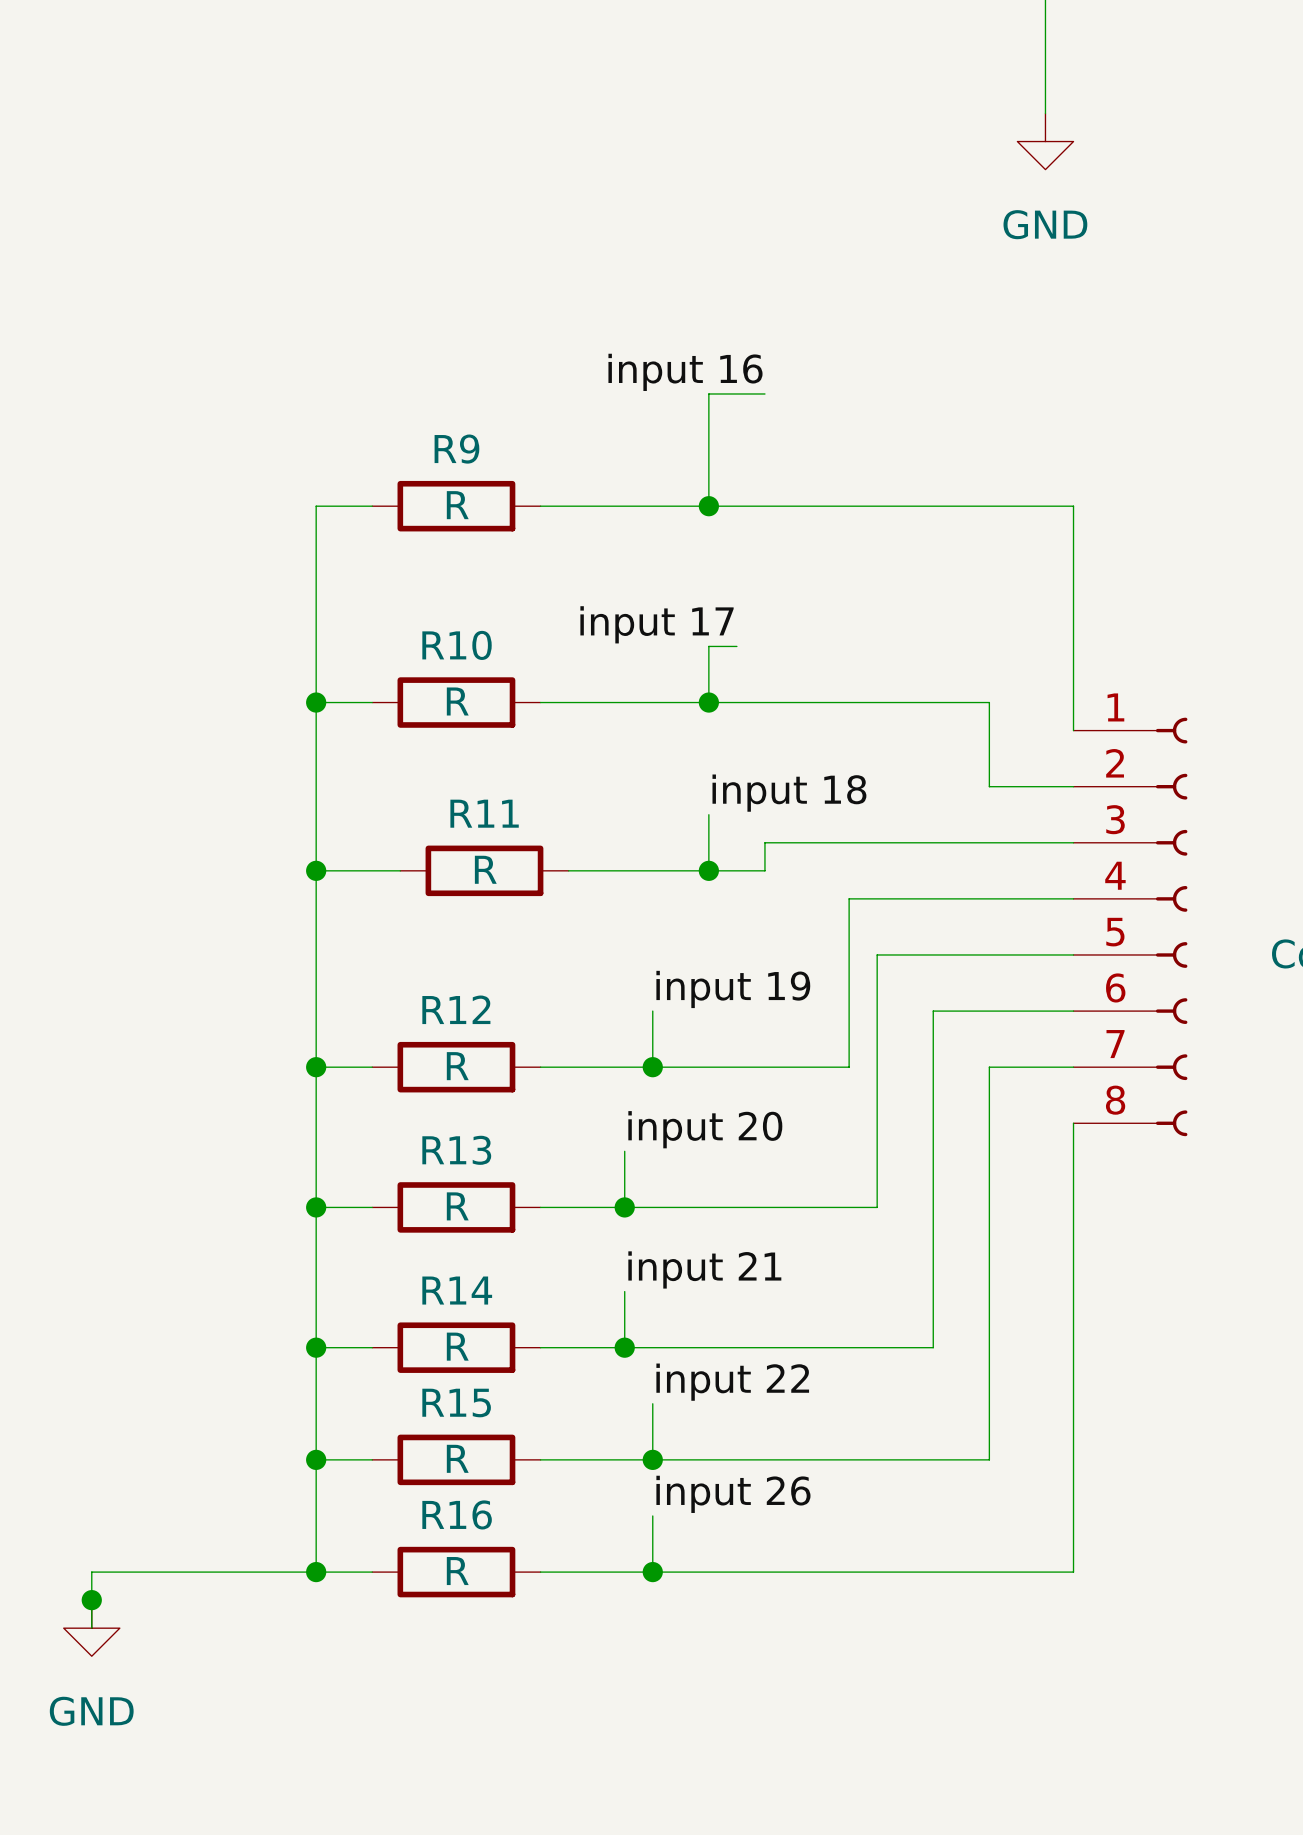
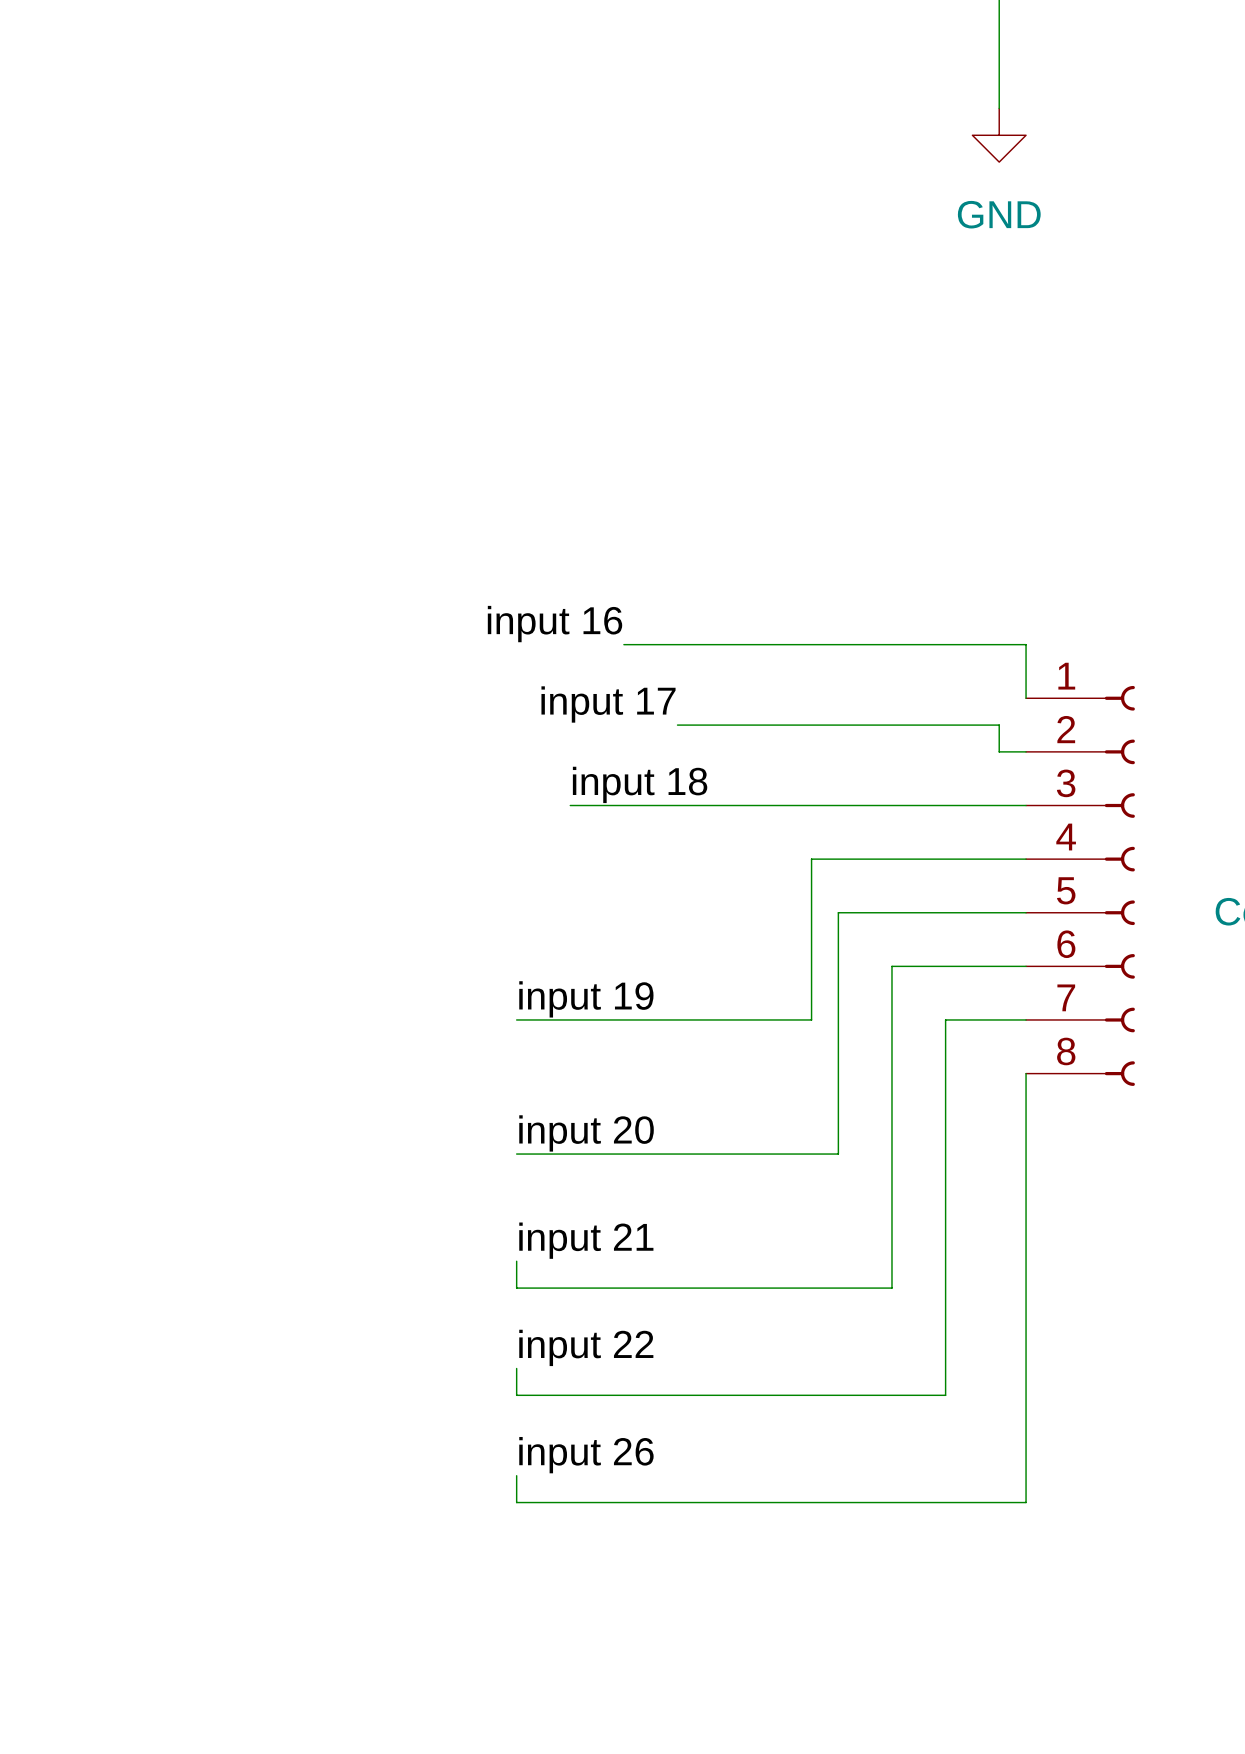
label position: input 16 (685, 372) -> input 16 (555, 624)
wire: (764, 393) (708, 393) (708, 506) -> none
wire: (372, 506) (316, 506) (316, 1572) -> none
R9: R (456, 506) -> none
wire: (540, 506) (1073, 506) (1073, 674) -> (623, 644) (1026, 644)
junction: (708, 506) -> none
label position: input 17 (657, 624) -> input 17 (608, 704)
wire: (736, 646) (708, 646) (708, 702) -> none
wire: (316, 702) (372, 702) -> none
junction: (316, 702) -> none
R10: R (456, 702) -> none
wire: (540, 702) (989, 702) (989, 786) (1045, 786) -> (677, 725) (999, 725) (999, 751)
junction: (708, 702) -> none
label position: input 18 (789, 793) -> input 18 (640, 784)
wire: (708, 814) (708, 870) -> none
wire: (764, 842) (764, 870) (568, 870) -> (731, 805) (570, 805)
wire: (316, 870) (400, 870) -> none
junction: (316, 870) -> none
R11: R (484, 870) -> none
junction: (708, 870) -> none
label position: input 19 (733, 989) -> input 19 (586, 999)
wire: (652, 1011) (652, 1067) -> none
wire: (316, 1067) (372, 1067) -> none
junction: (316, 1067) -> none
R12: R (456, 1067) -> none
junction: (652, 1067) -> none
label position: input 20 (705, 1129) -> input 20 (586, 1133)
wire: (624, 1151) (624, 1207) -> none
wire: (316, 1207) (372, 1207) -> none
junction: (316, 1207) -> none
R13: R (456, 1207) -> none
junction: (624, 1207) -> none
label position: input 21 (704, 1269) -> input 21 (586, 1240)
wire: (624, 1291) (624, 1347) -> none
wire: none -> (516, 1261) (516, 1288)
wire: (316, 1347) (372, 1347) -> none
junction: (316, 1347) -> none
R14: R (456, 1347) -> none
junction: (624, 1347) -> none
label position: input 22 (732, 1382) -> input 22 (586, 1347)
wire: (652, 1403) (652, 1459) -> none
wire: none -> (516, 1368) (516, 1395)
wire: (316, 1459) (372, 1459) -> none
junction: (316, 1459) -> none
R15: R (456, 1459) -> none
junction: (652, 1459) -> none
label position: input 26 (733, 1494) -> input 26 (586, 1455)
wire: (652, 1515) (652, 1572) -> none
wire: none -> (516, 1475) (516, 1502)
junction: (316, 1572) -> none
wire: (372, 1572) (91, 1572) (91, 1628) -> none
R16: R (456, 1572) -> none
junction: (652, 1572) -> none
junction: (91, 1600) -> none
power symbol: GND (91, 1628) -> none

